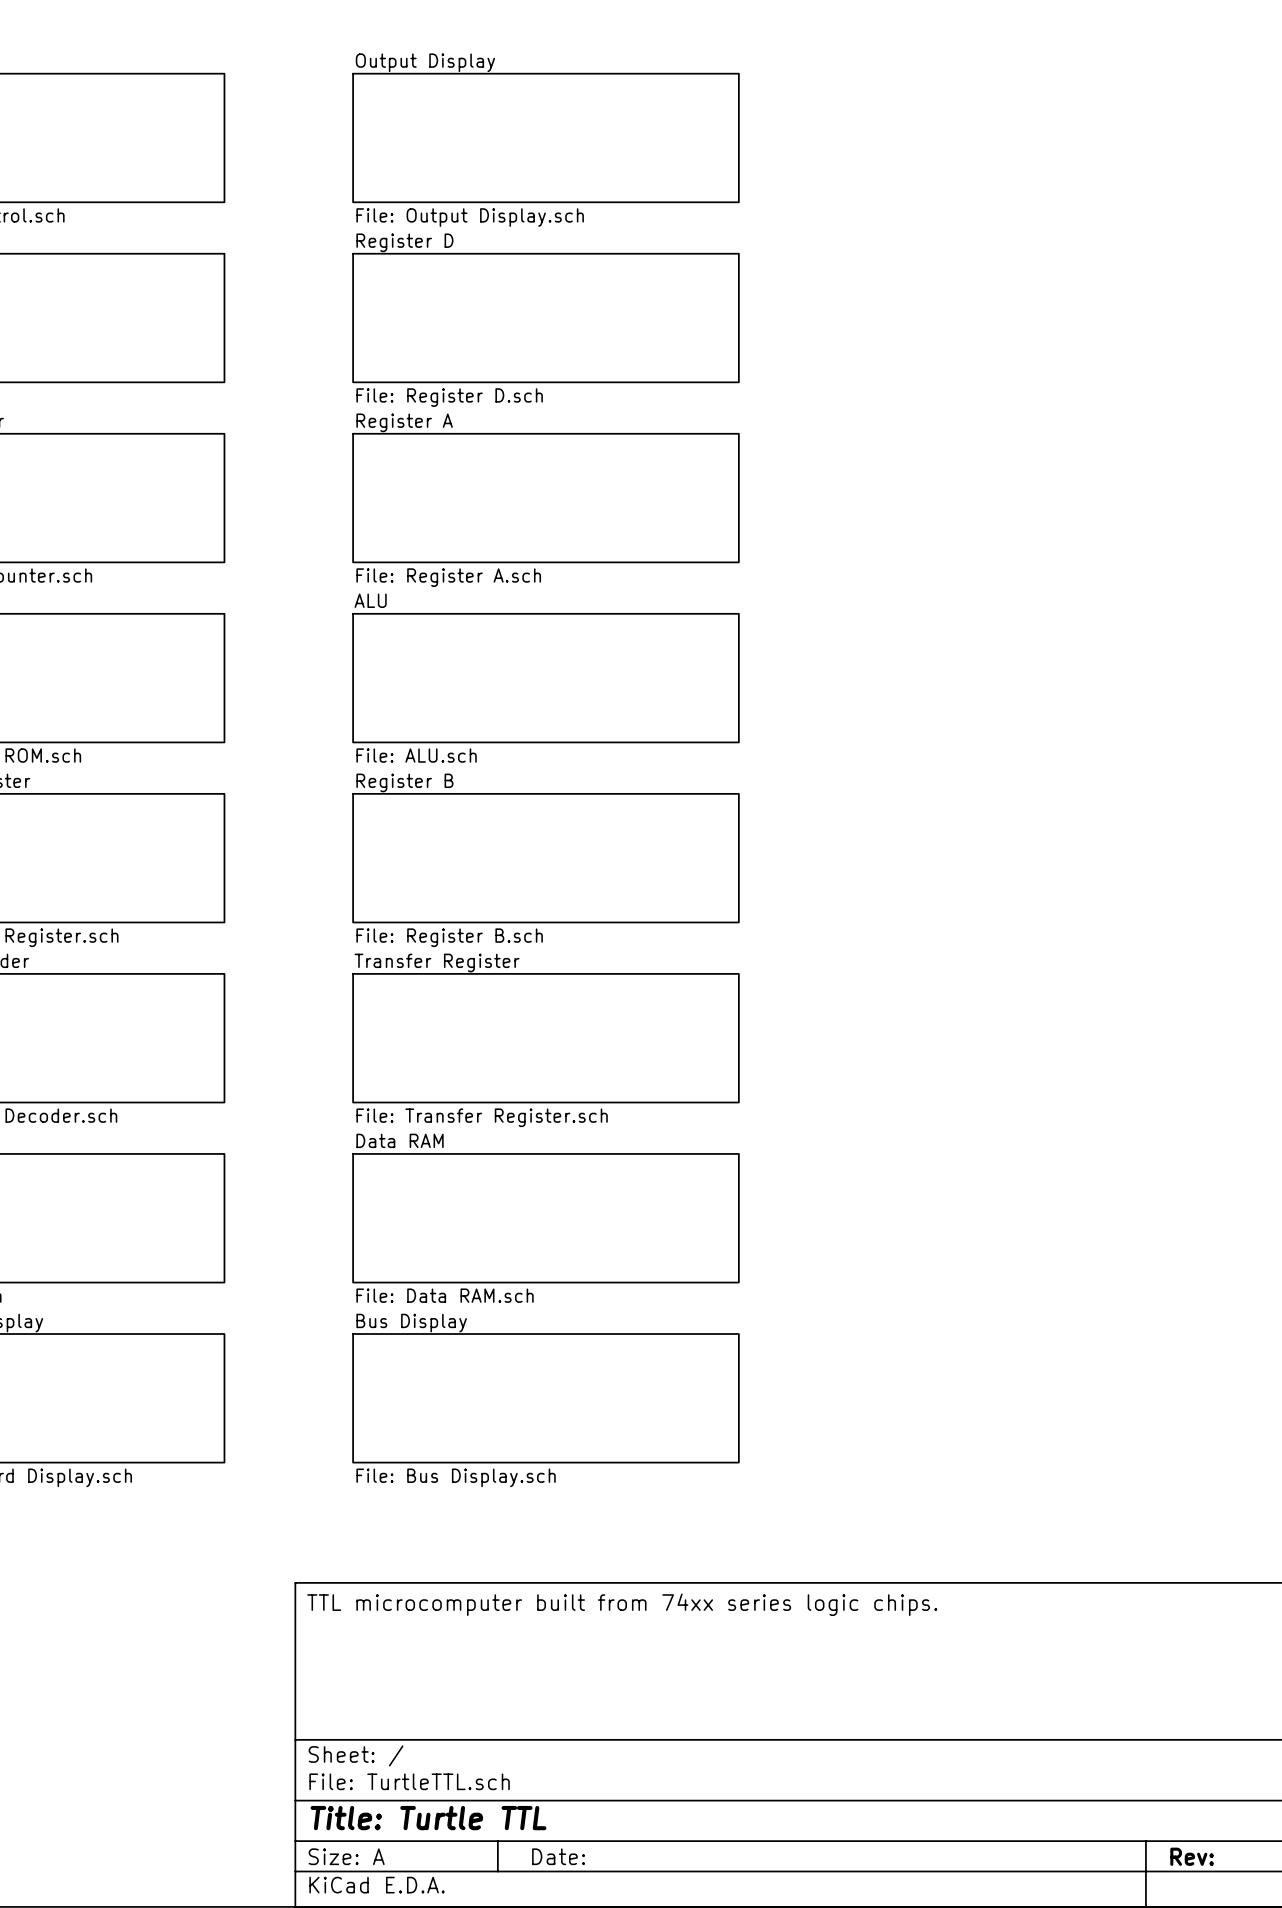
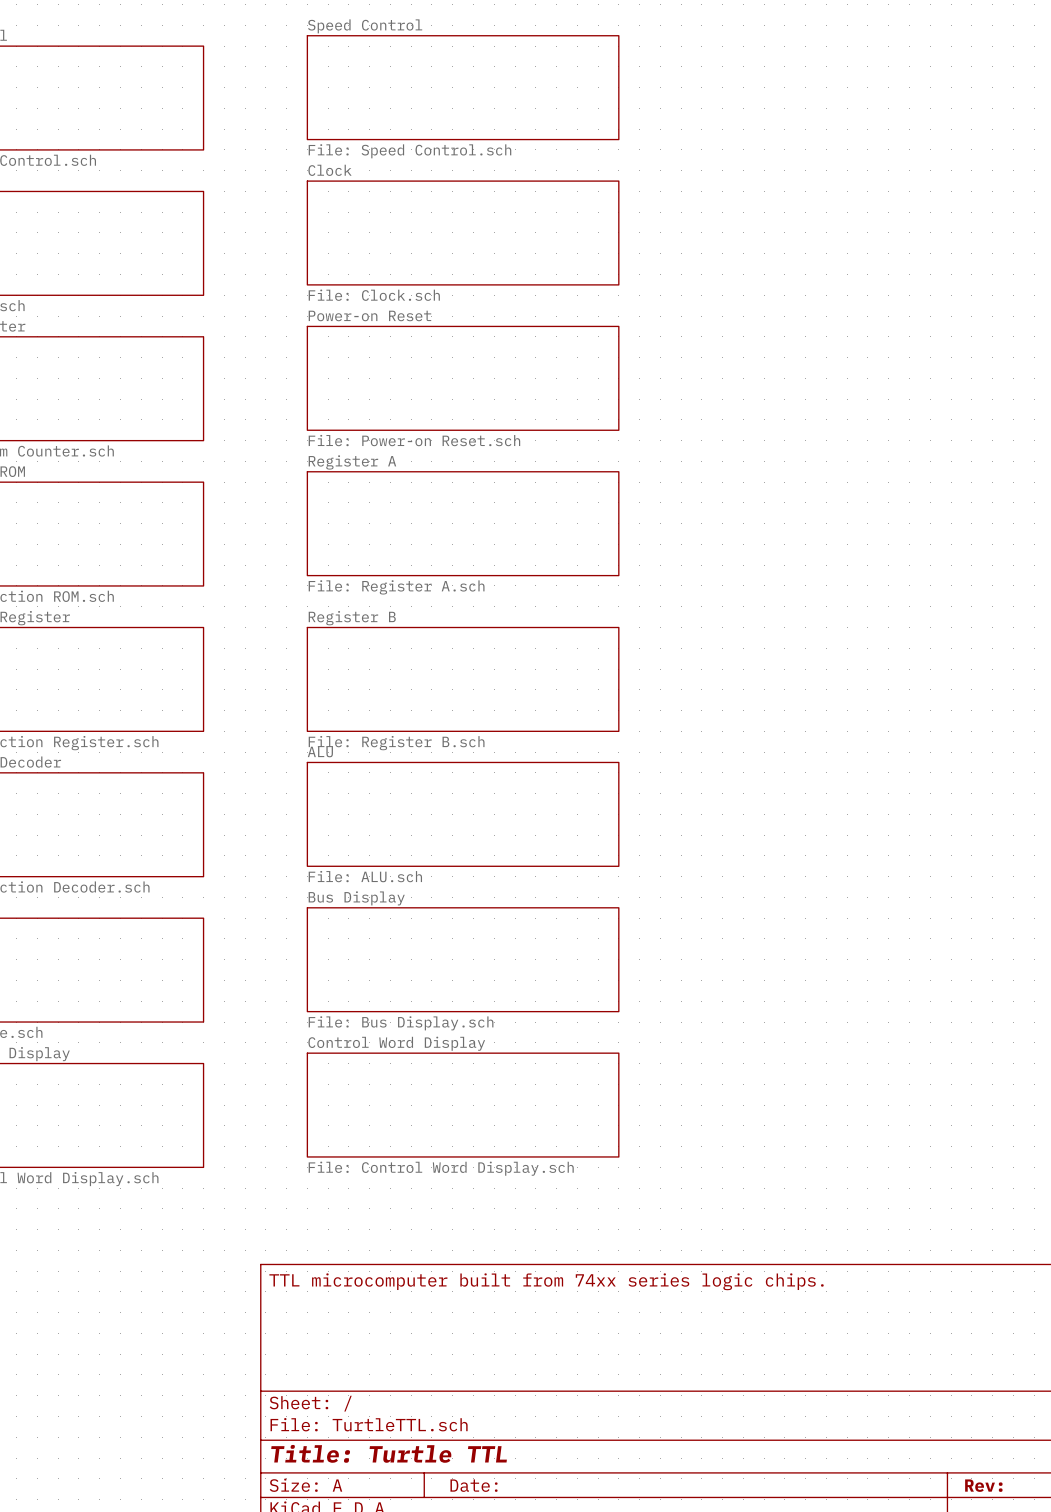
sheet Speed Control: none -> File: Speed Control.sch (463, 87)
sheet Output Display: File: Output Display.sch (545, 137) -> none
sheet Clock: none -> File: Clock.sch (463, 232)
sheet Register D: File: Register D.sch (545, 318) -> none
sheet Power-on Reset: none -> File: Power-on Reset.sch (463, 378)
sheet Register A position: (545, 498) -> (463, 523)
sheet ALU: File: ALU.sch (545, 678) -> none
sheet ALU: none -> File: ALU.sch (463, 814)
sheet Transfer Register: File: Transfer Register.sch (545, 1038) -> none
sheet Data RAM: File: Data RAM.sch (545, 1218) -> none
sheet Control Word Display: none -> File: Control Word Display.sch (463, 1105)
sheet Bus Display position: (545, 1398) -> (463, 959)

